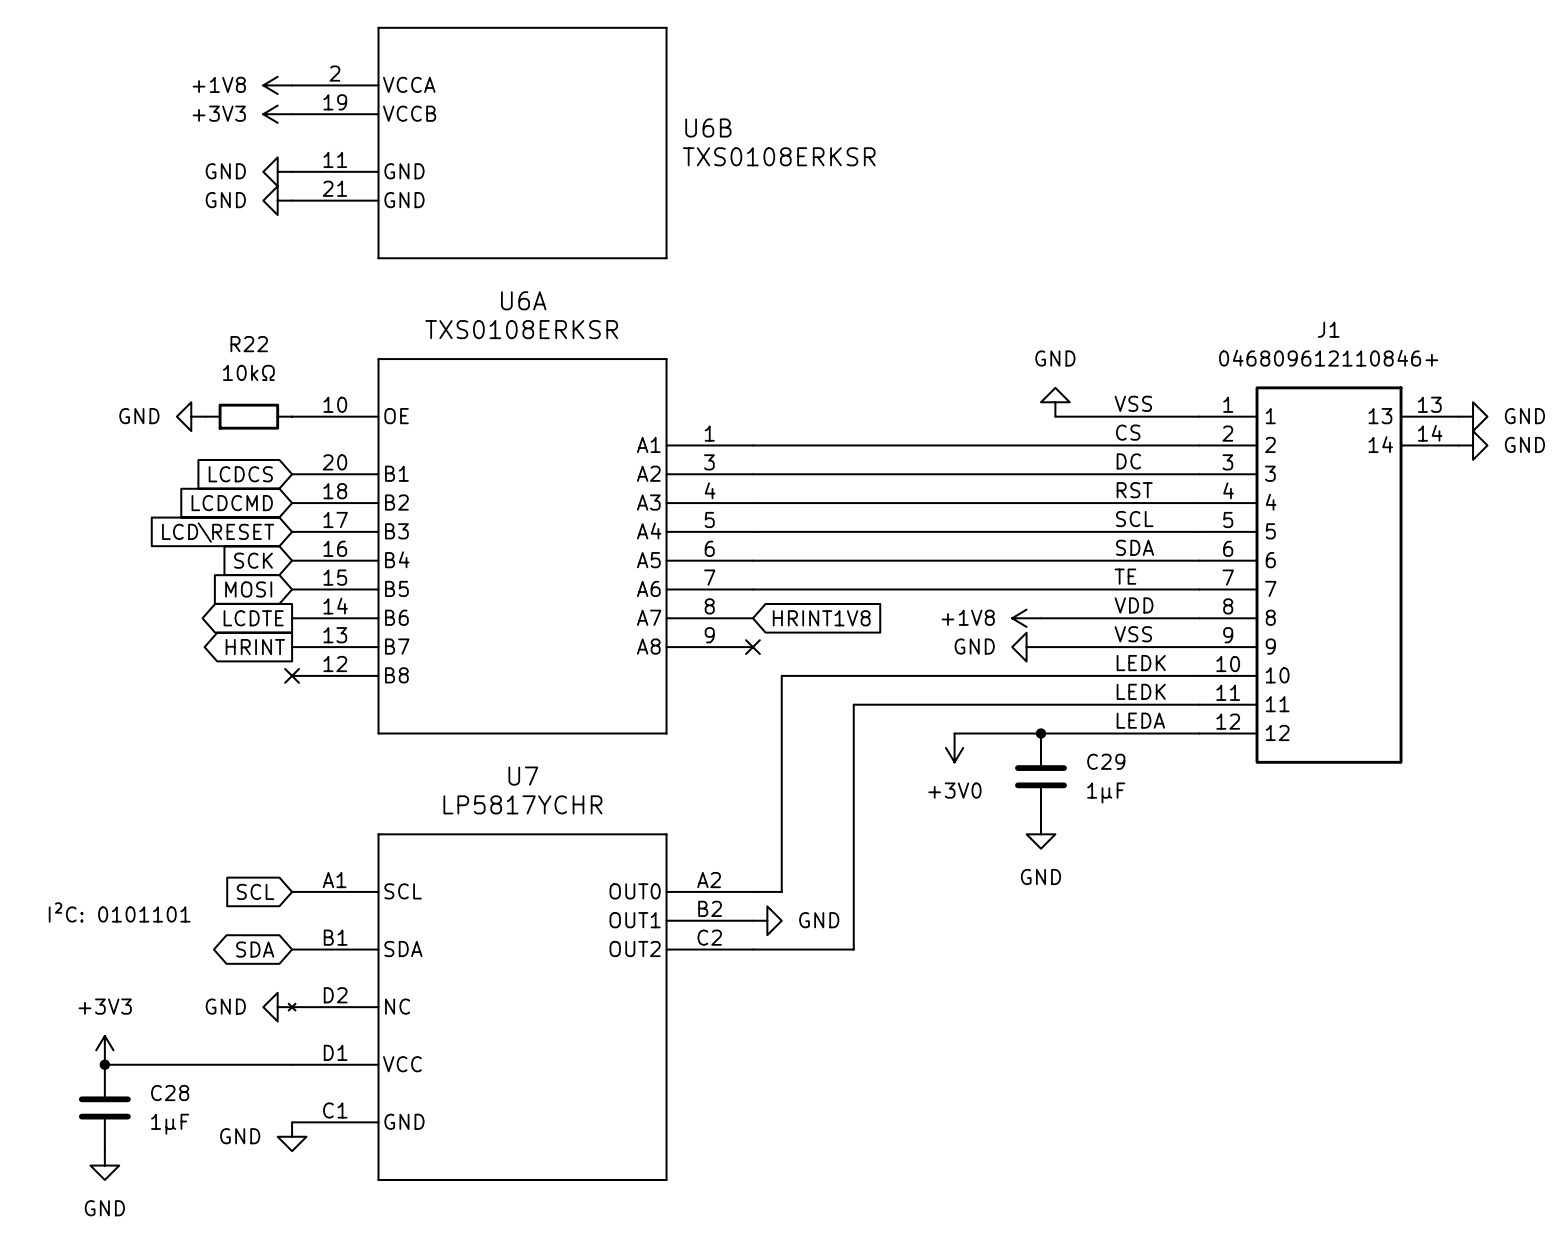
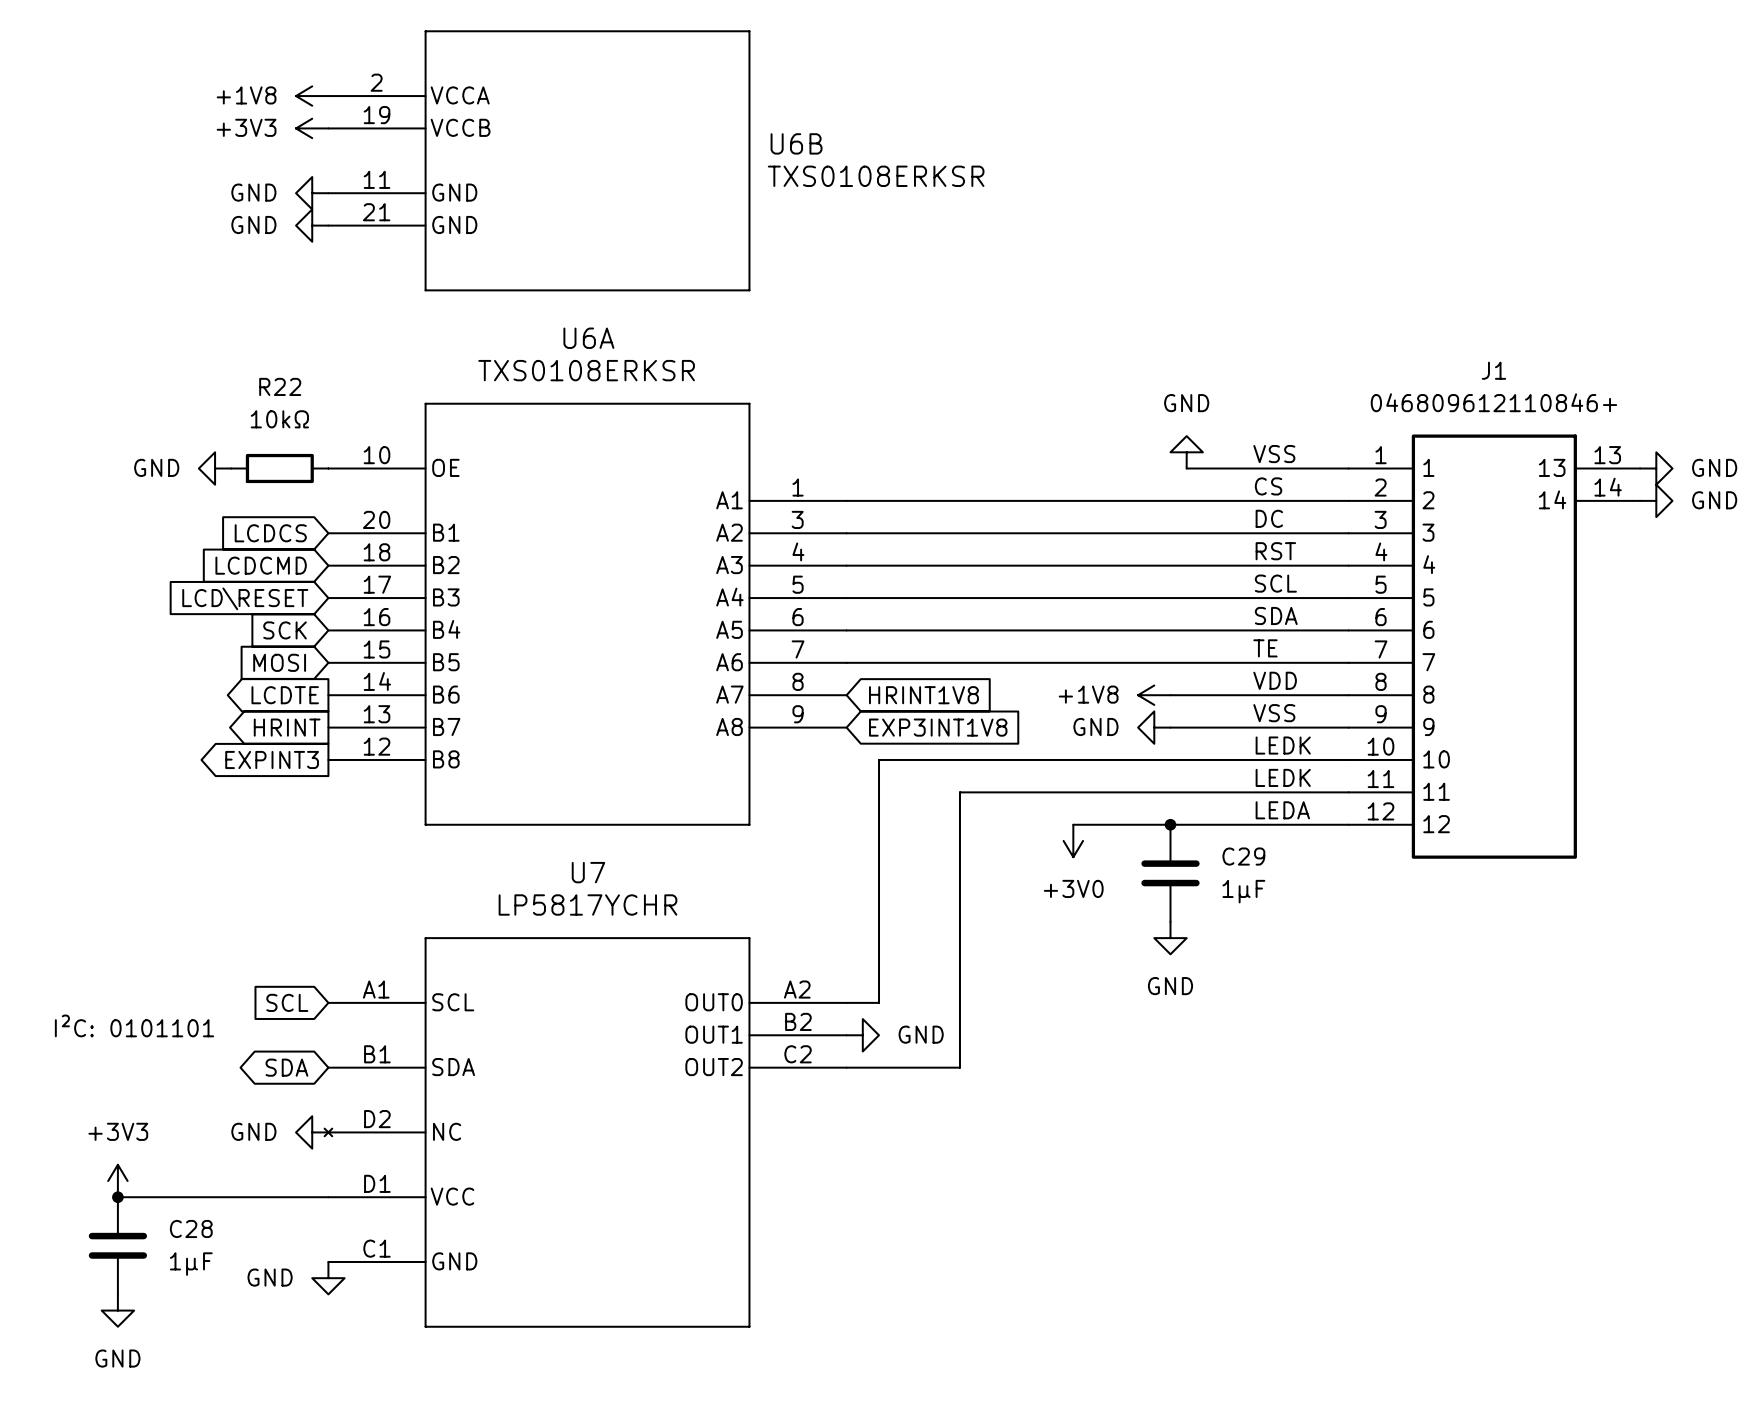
no-connect mark: (752, 647) -> none
global label: none -> EXP3INT1V8 (938, 727)
global label: none -> EXPINT3 (272, 759)
no-connect mark: (292, 675) -> none

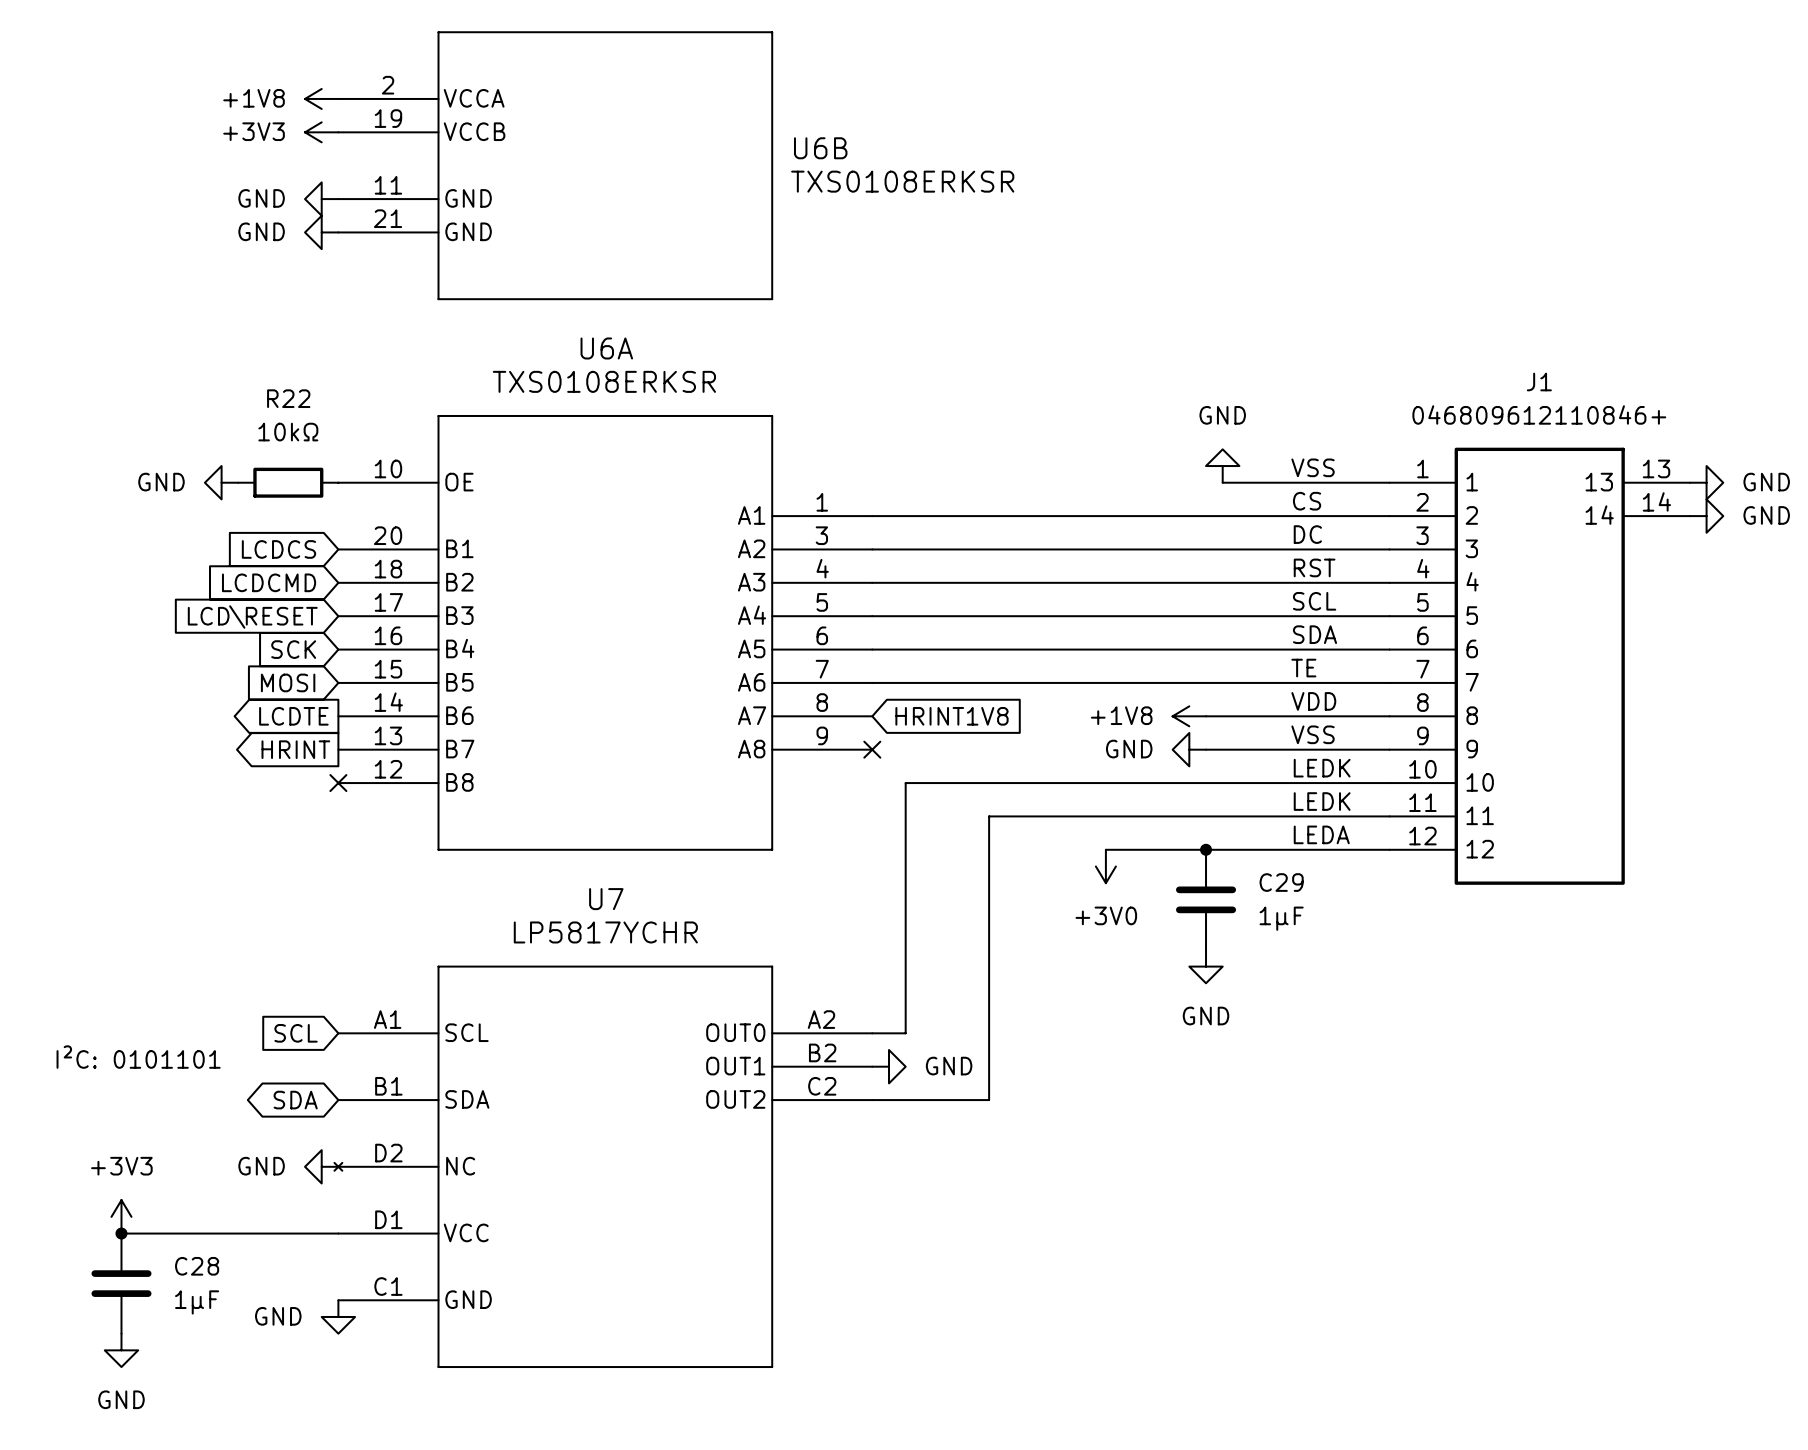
no-connect mark: none -> (872, 749)
global label: EXP3INT1V8 (938, 727) -> none
global label: EXPINT3 (272, 759) -> none
no-connect mark: none -> (338, 783)

